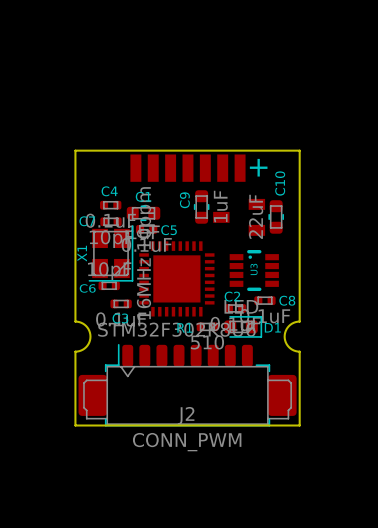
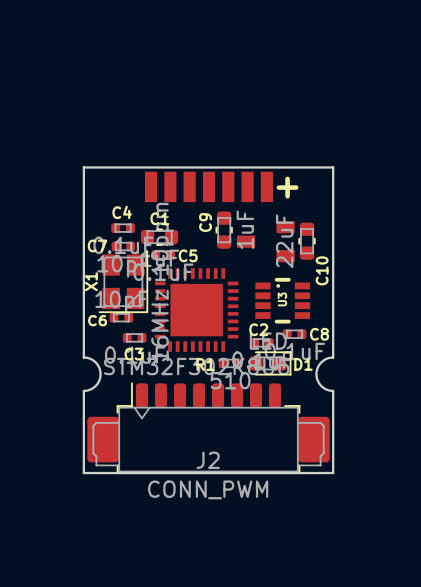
C10 name position: C10 (280, 183) -> C10 (322, 270)

